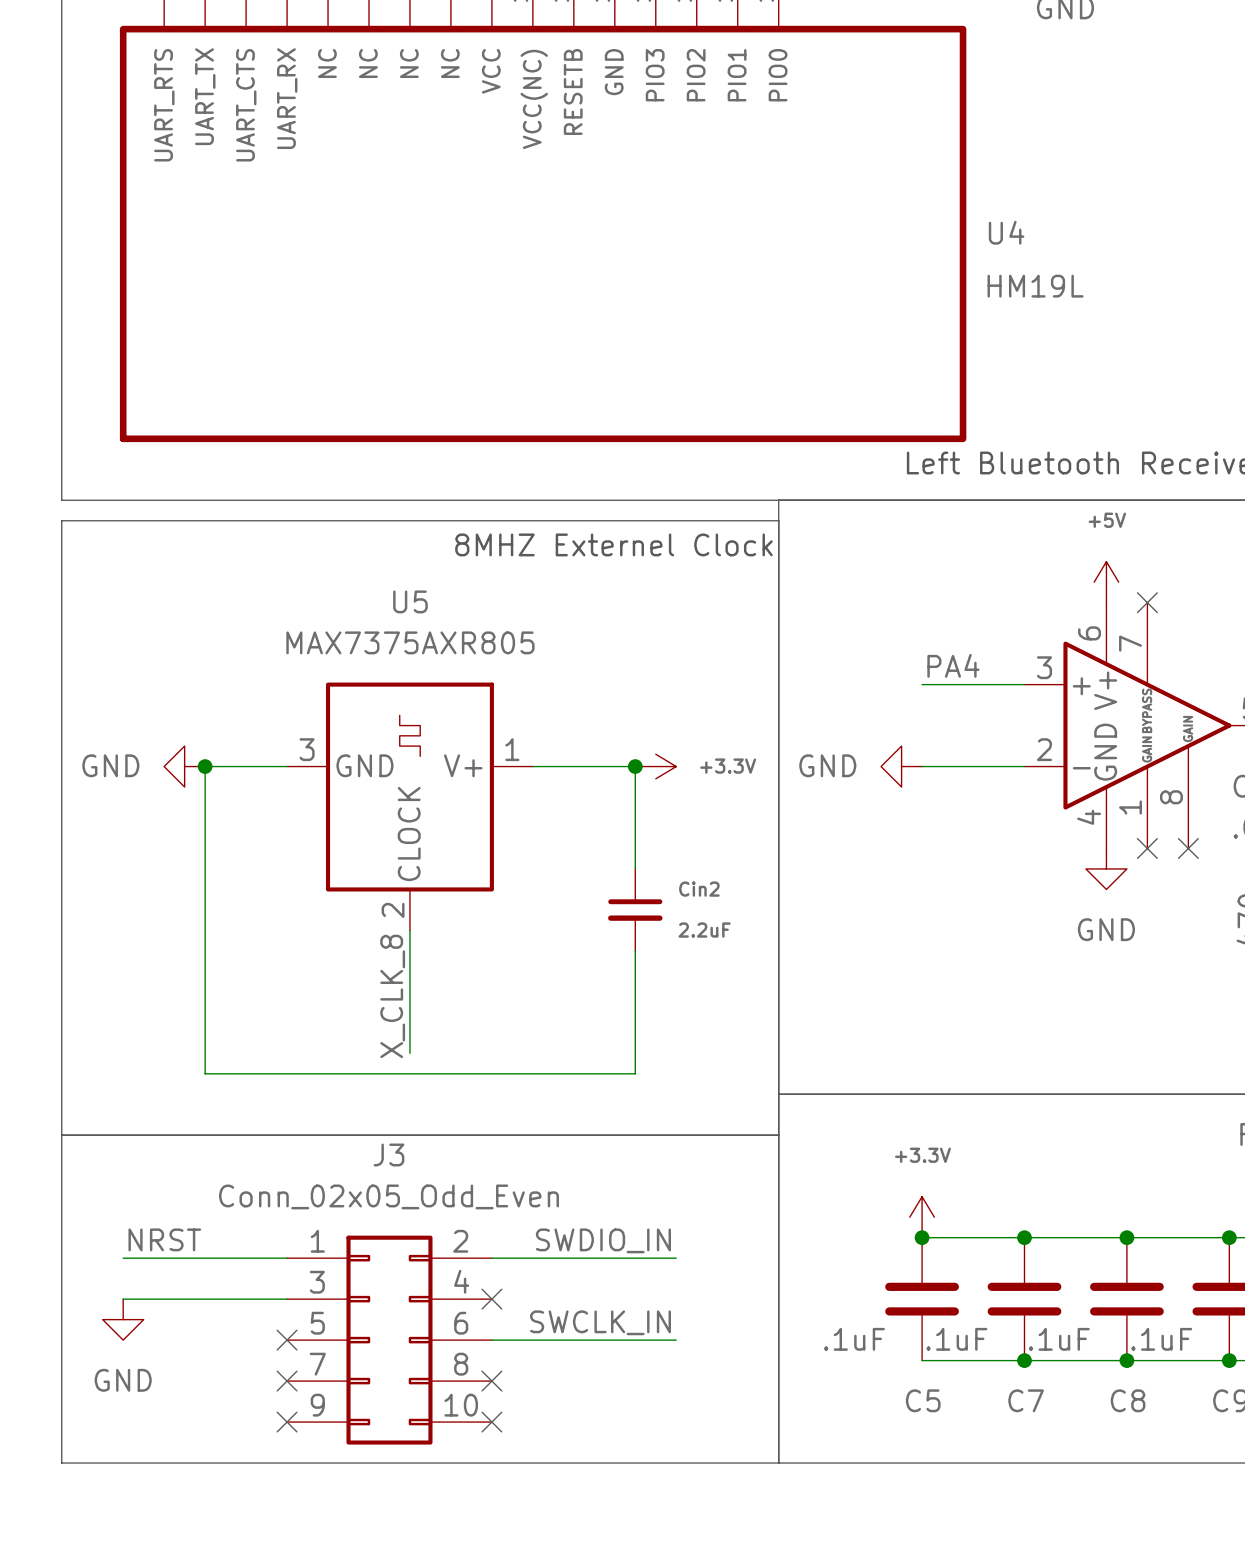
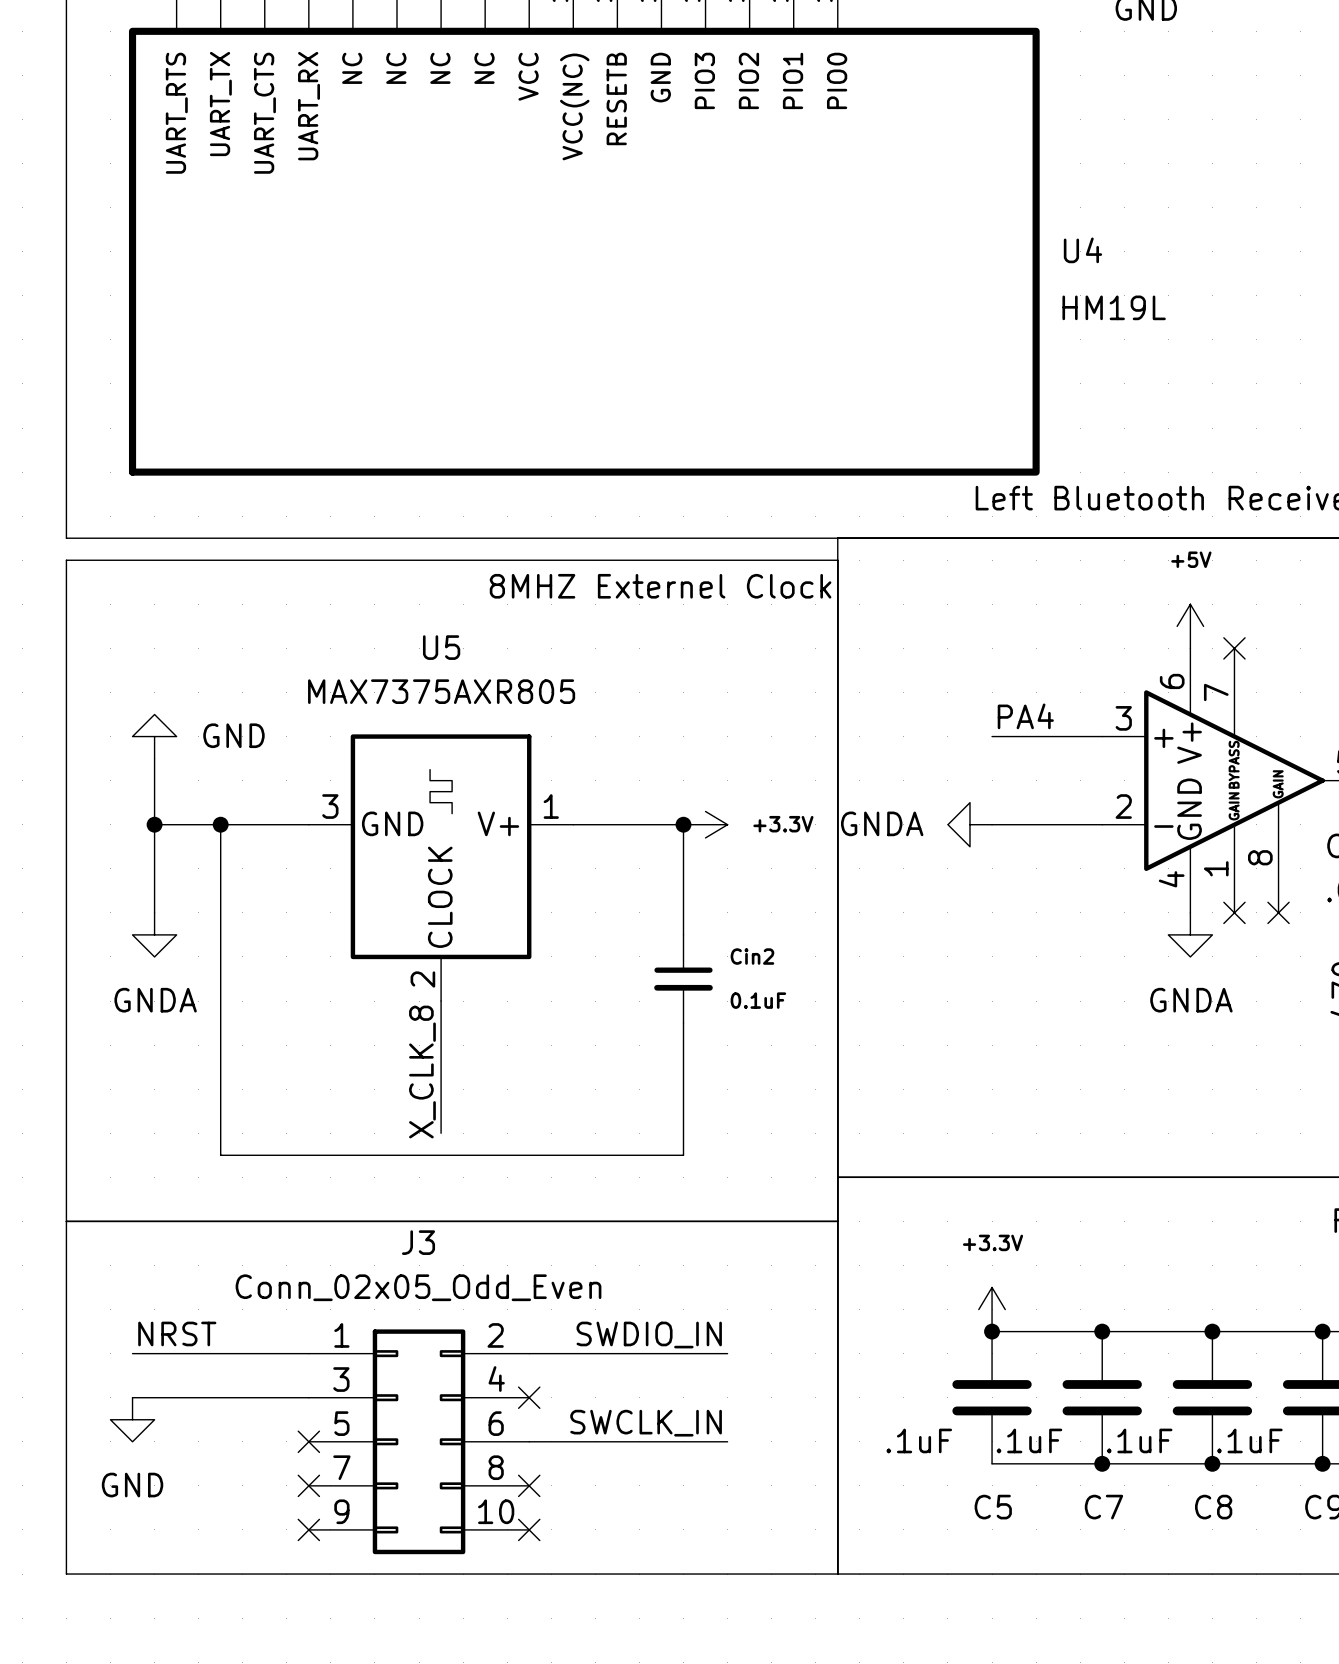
wire: none -> (154, 758) (154, 912)
power symbol text position: GND (110, 765) -> GND (233, 735)
wire: none -> (154, 824) (220, 824)
junction: none -> (154, 824)
power symbol rotation: 0° (184, 766) -> 90° clockwise (154, 736)
power symbol position: GND (184, 766) -> GND (154, 736)
power symbol: GND (901, 766) -> GNDA (969, 824)
power symbol: none -> GNDA (154, 934)
power symbol: GND (1106, 868) -> GNDA (1190, 934)
Cin2 value: 2.2uF (704, 930) -> 0.1uF (758, 1000)

